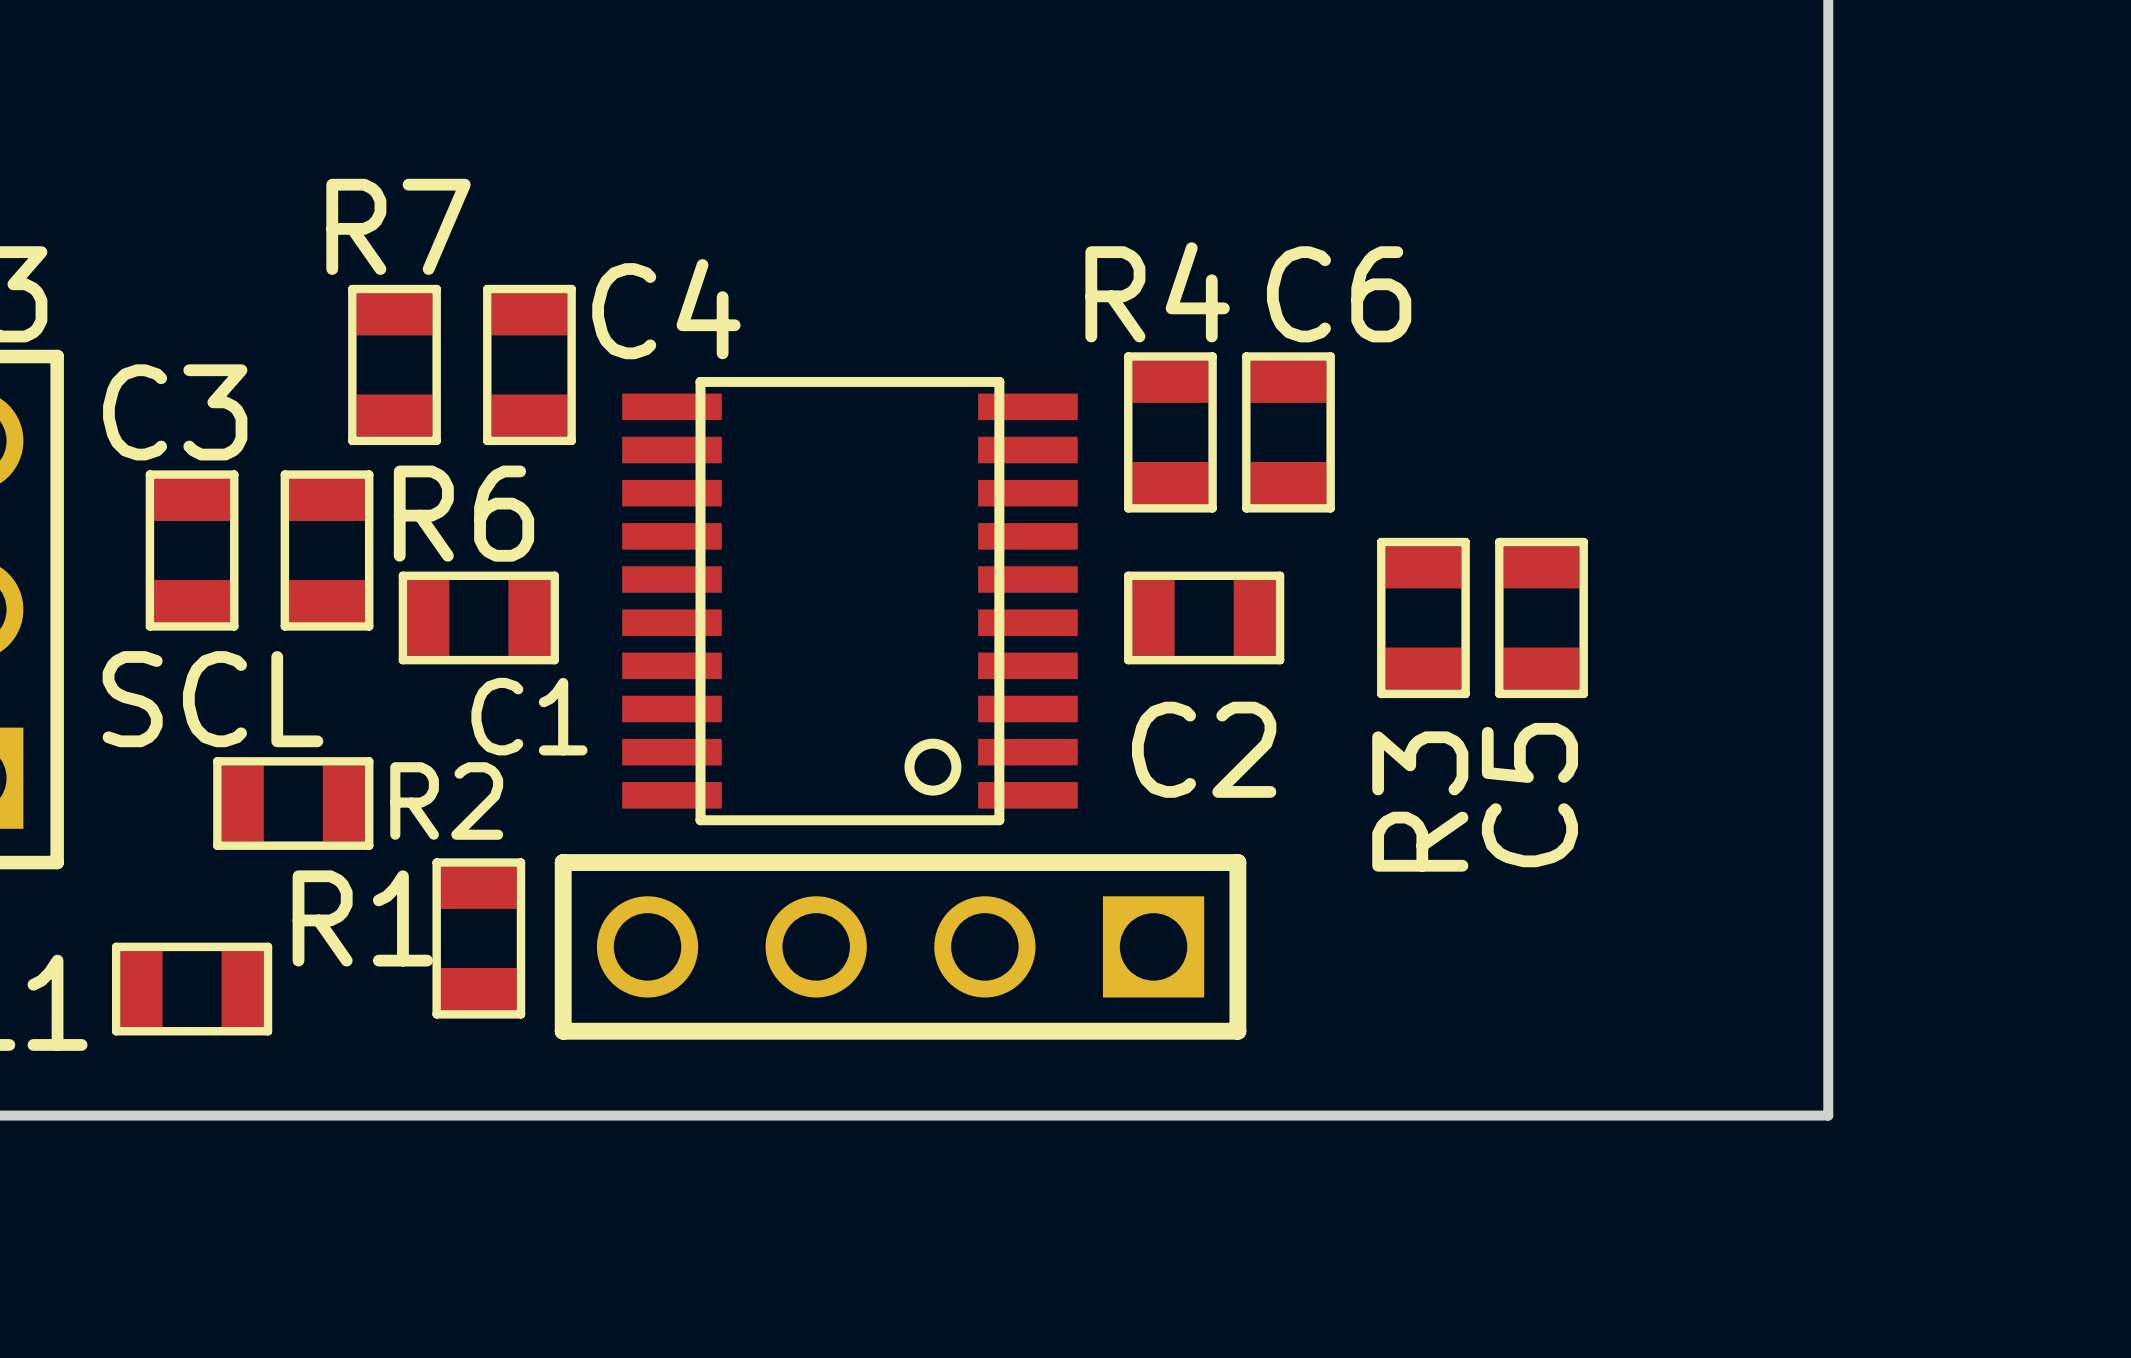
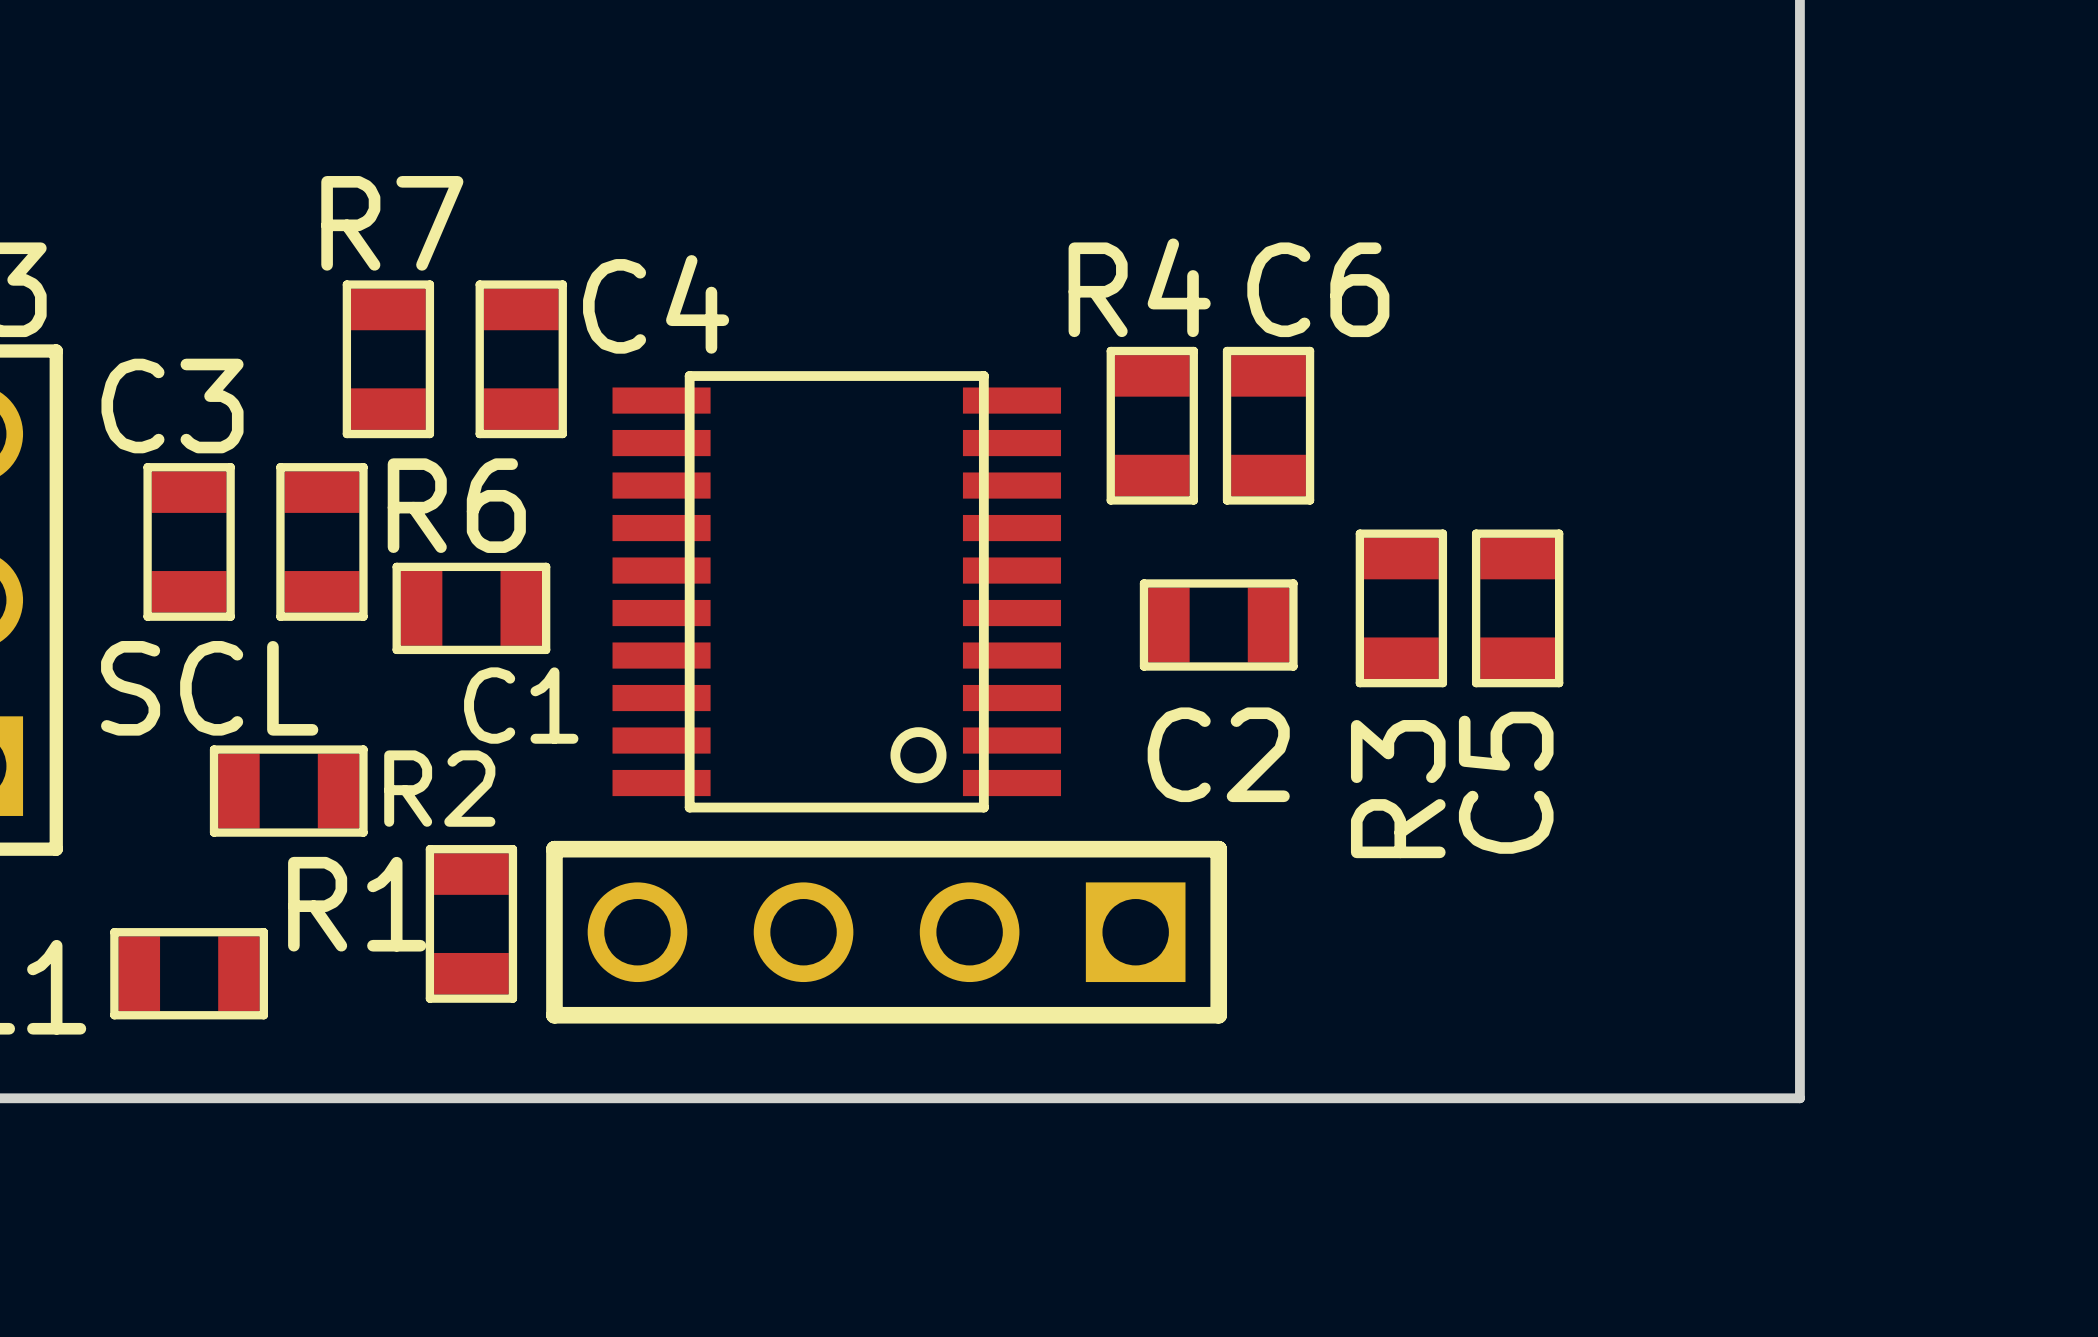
C2 position: (1204, 617) -> (1218, 625)

